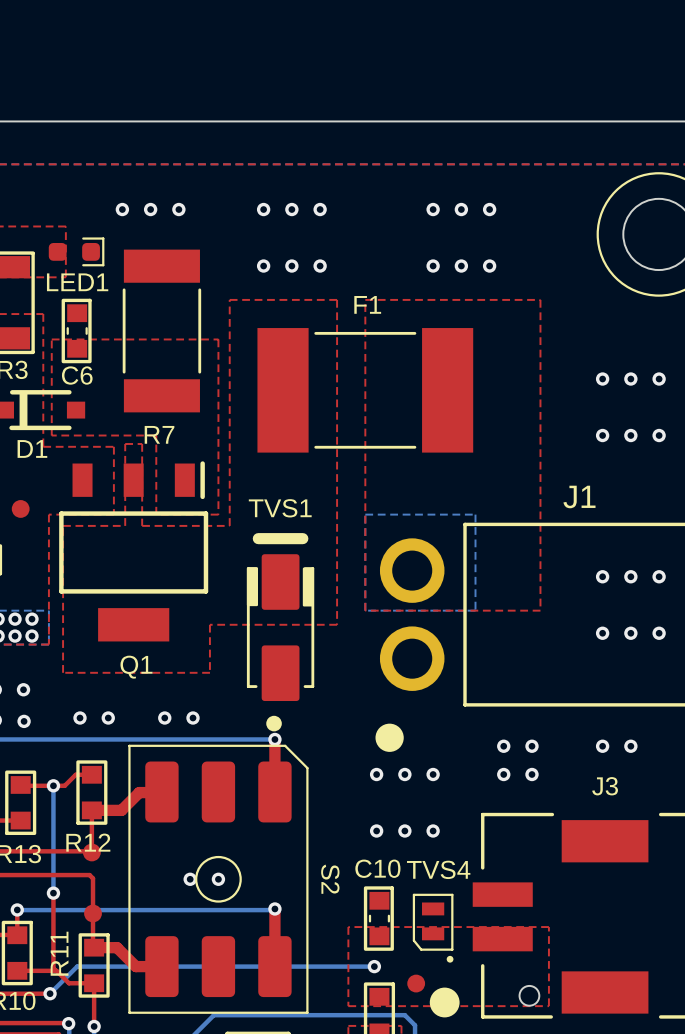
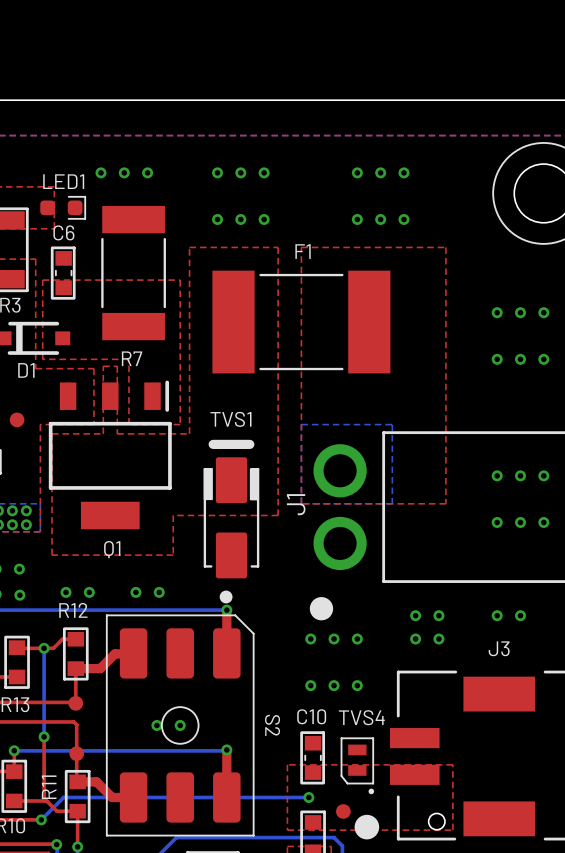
LED1 name position: LED1 (77, 282) -> LED1 (63, 181)
C6 name position: C6 (77, 375) -> C6 (63, 232)
J1 name rotation: 0° (579, 496) -> 90° counterclockwise (296, 504)
J1 name position: J1 (579, 496) -> J1 (296, 504)
R12 name position: R12 (88, 842) -> R12 (73, 610)

